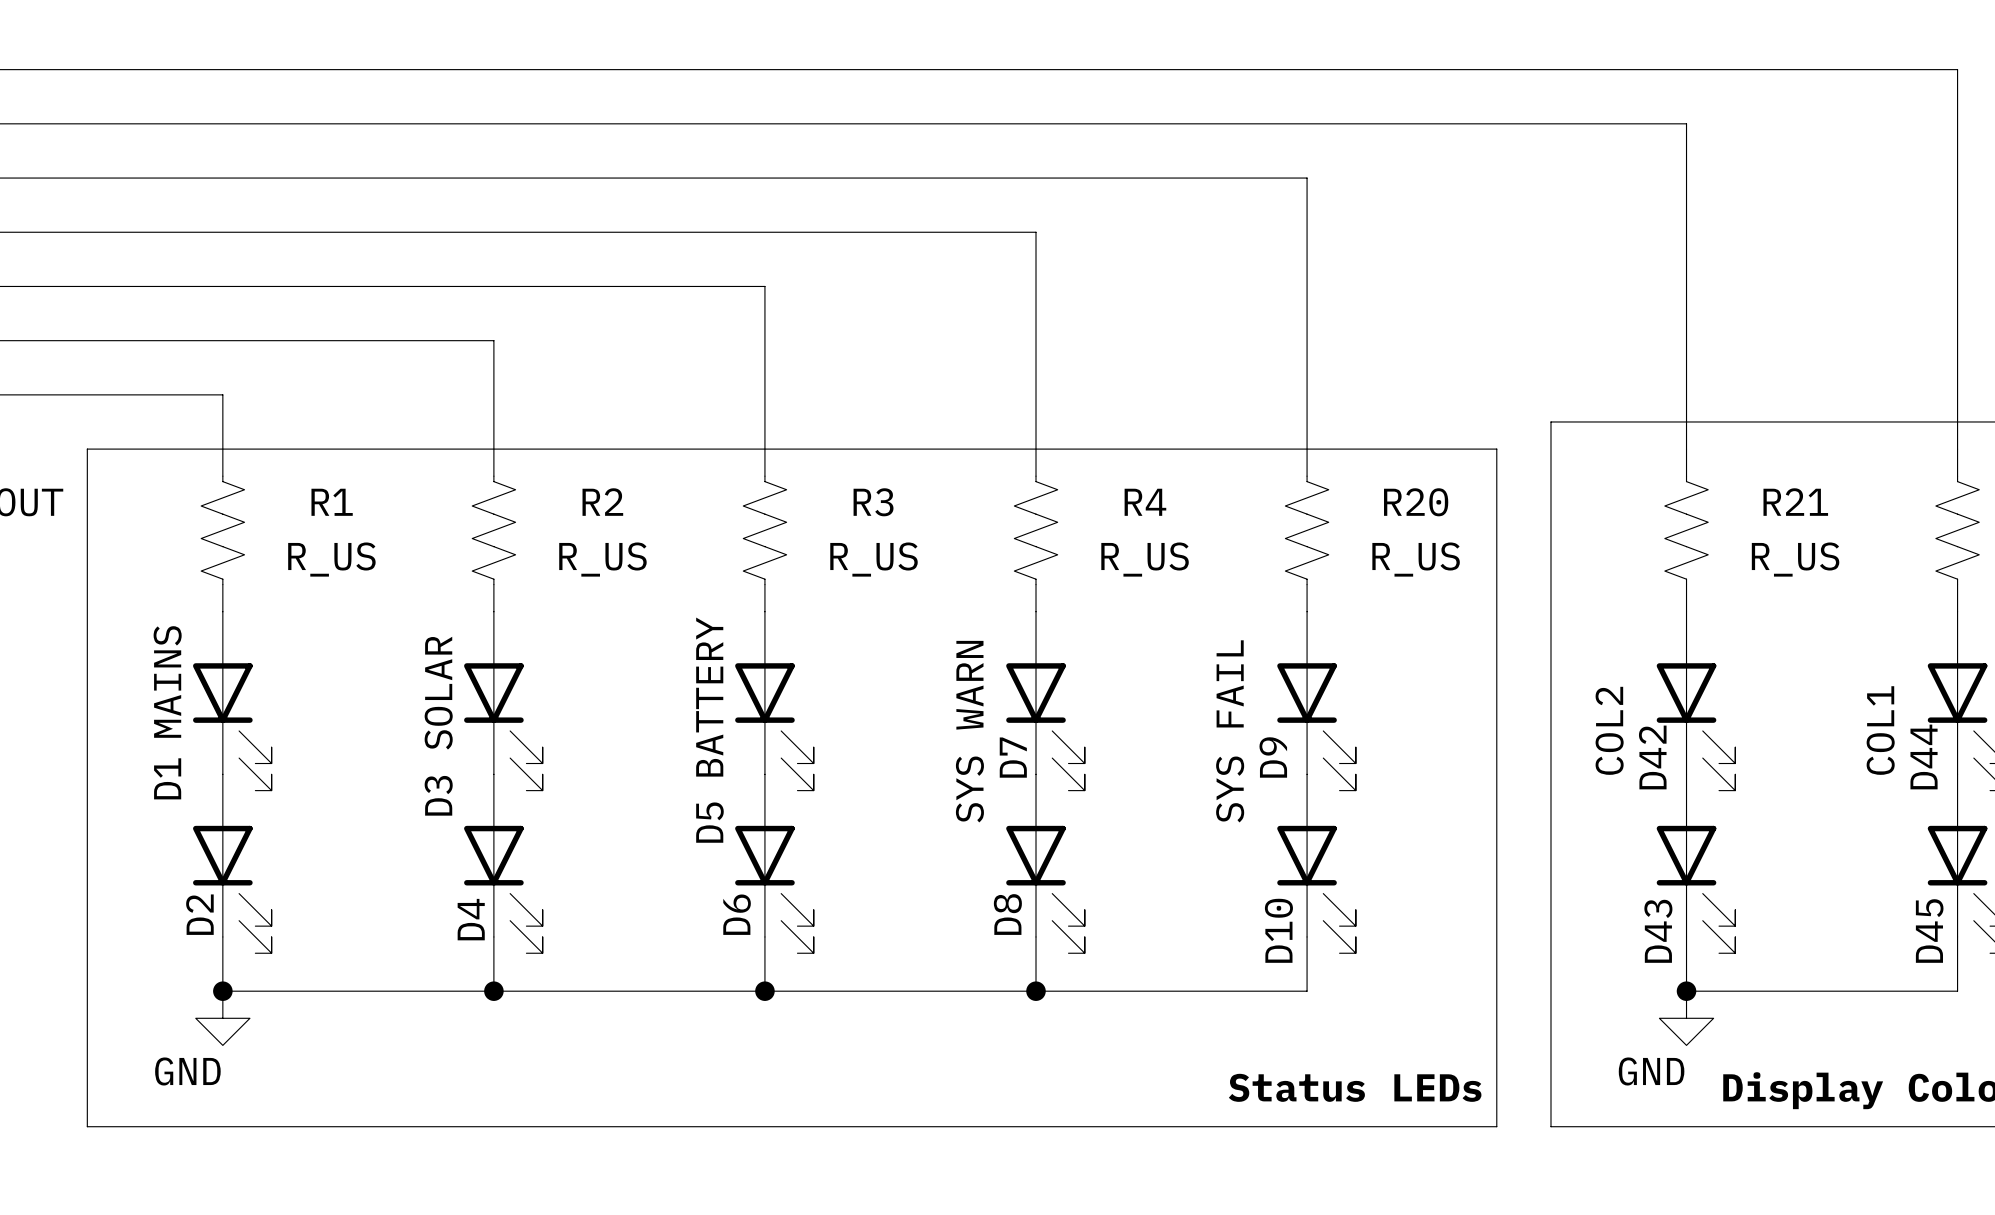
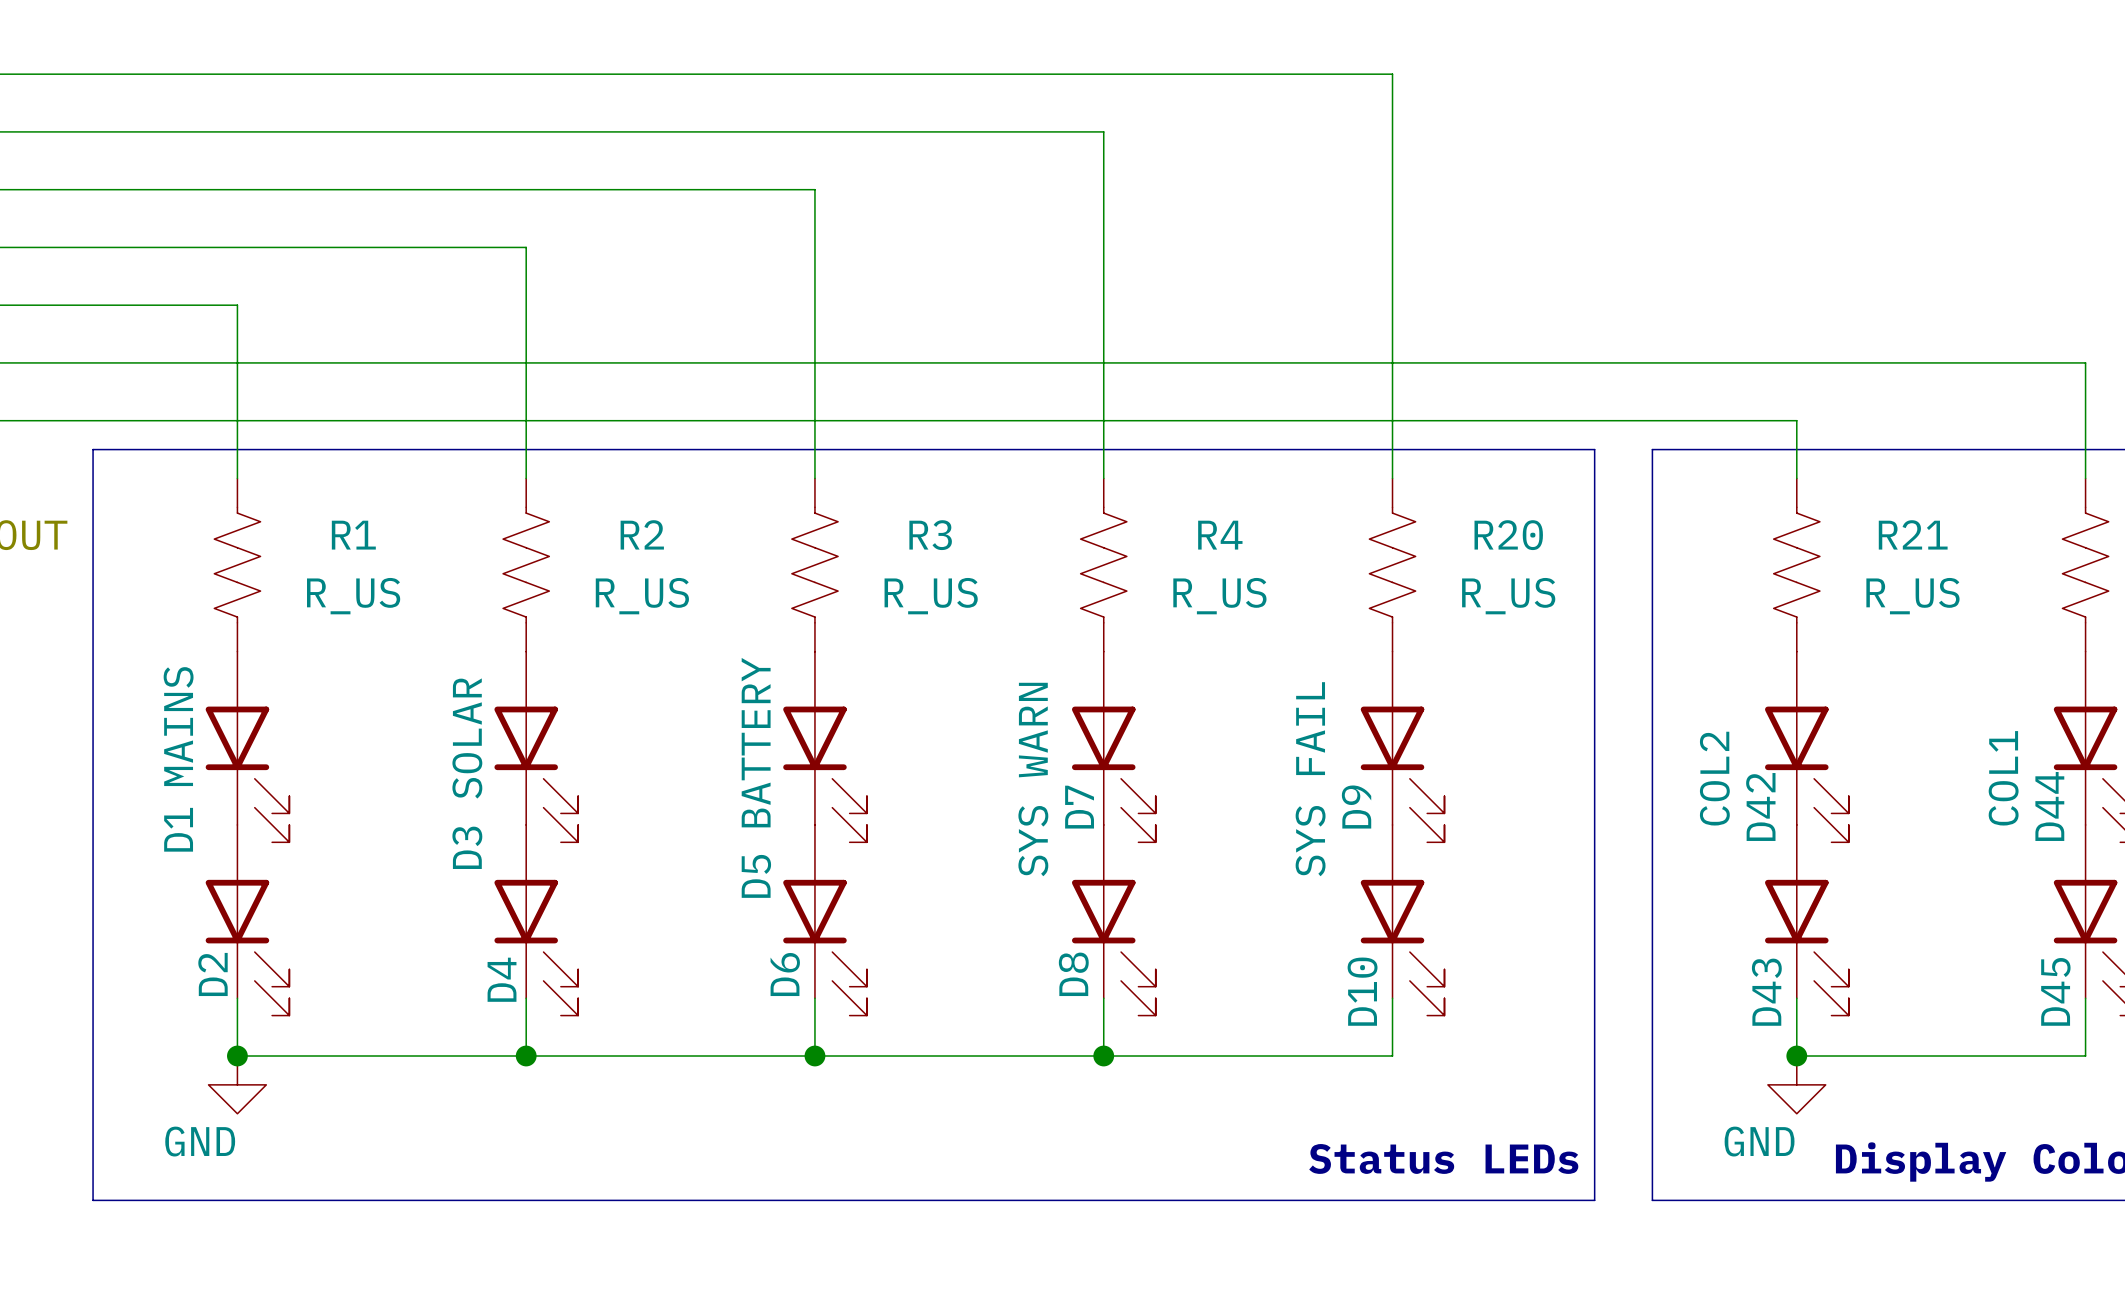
wire: (1307, 69) (1957, 69) (1957, 340) -> (526, 247) (526, 362) (2085, 362)
wire: (1036, 123) (1686, 123) (1686, 394) -> (237, 305) (237, 420) (1796, 420)
wire: (764, 178) (1307, 178) -> (1392, 74) (1392, 189)
wire: (493, 232) (1036, 232) -> (1103, 131) (1103, 247)
wire: (222, 286) (764, 286) -> (814, 189) (814, 305)
line: (87, 449) (1496, 449) -> (93, 478) (93, 449) (1594, 449) (1594, 478)

